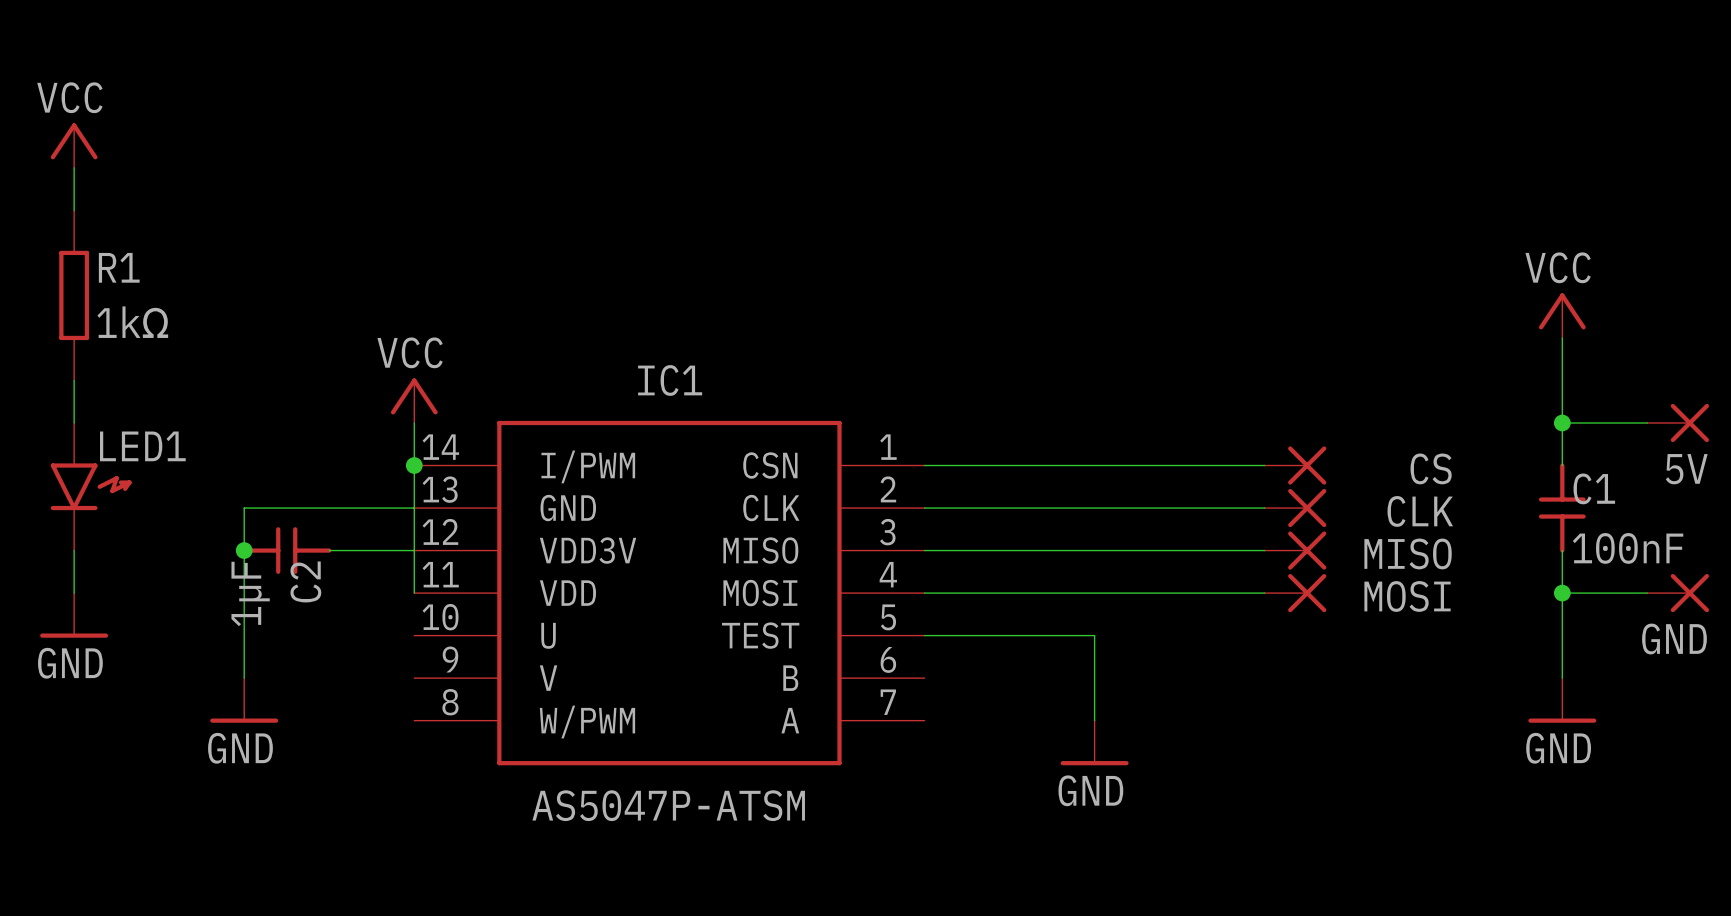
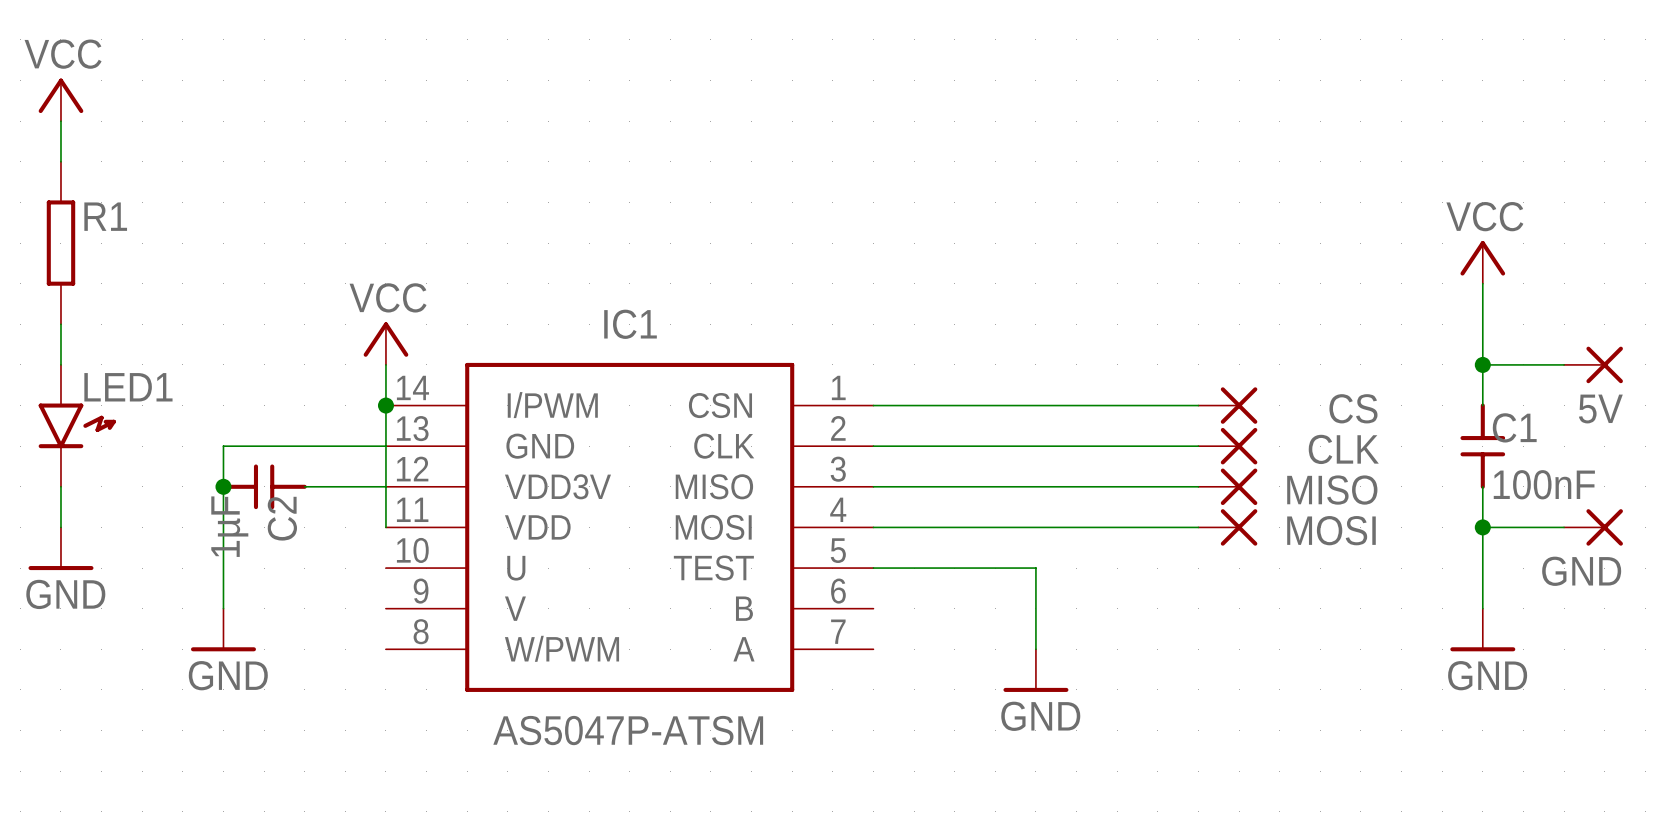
R1 value: 1kΩ (132, 322) -> none

